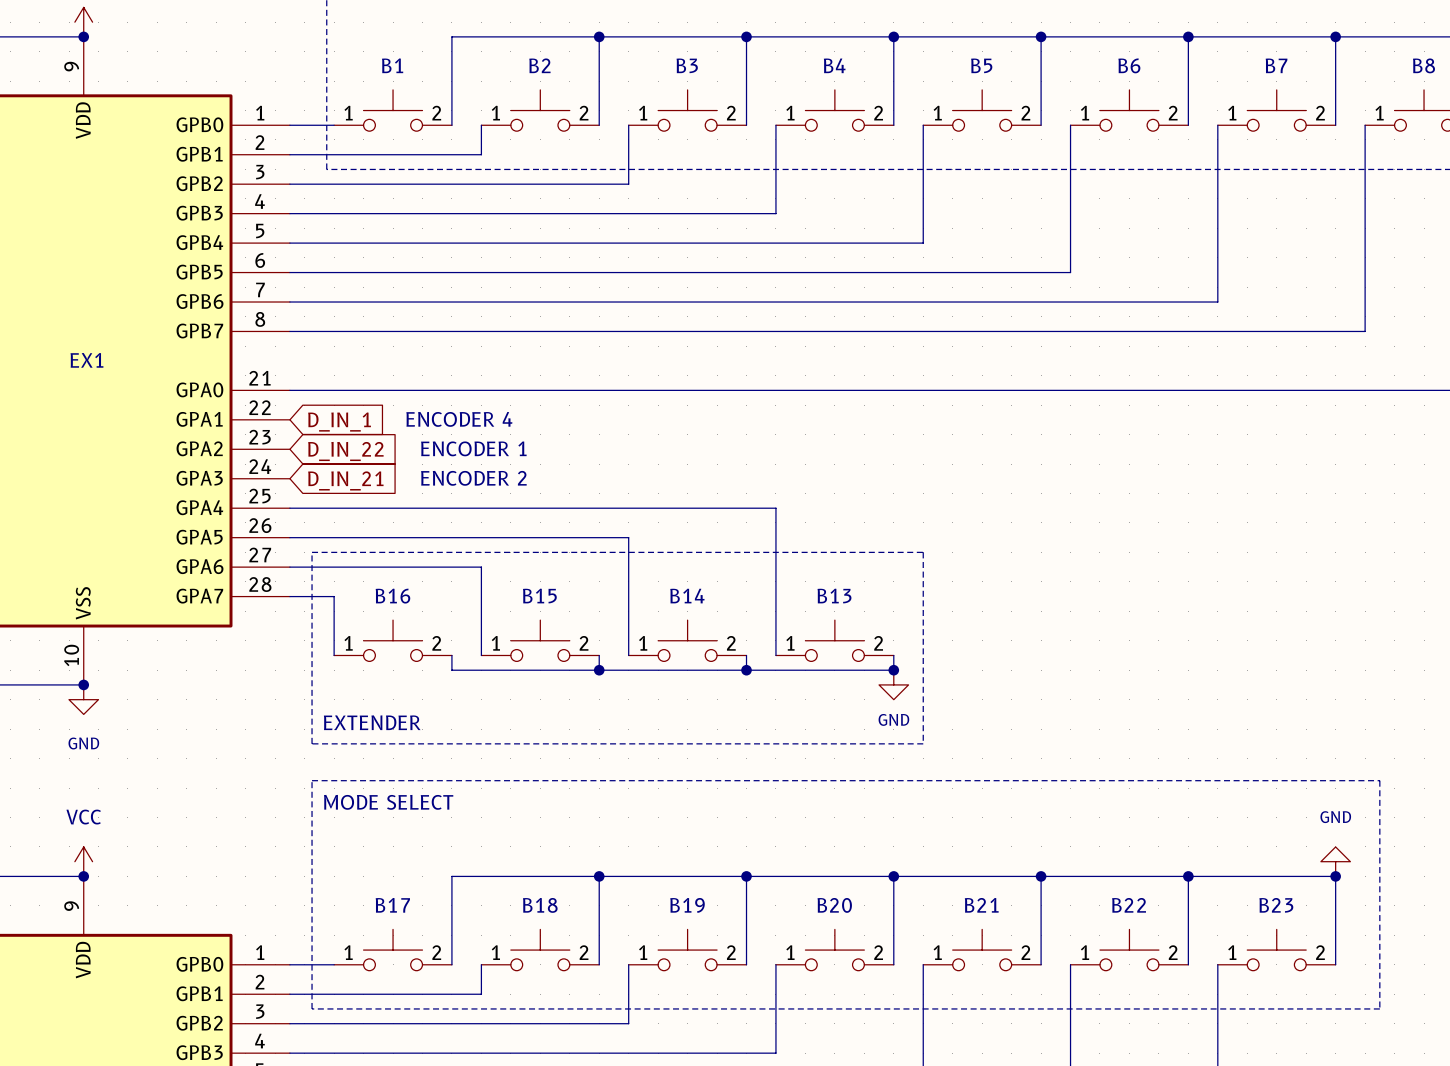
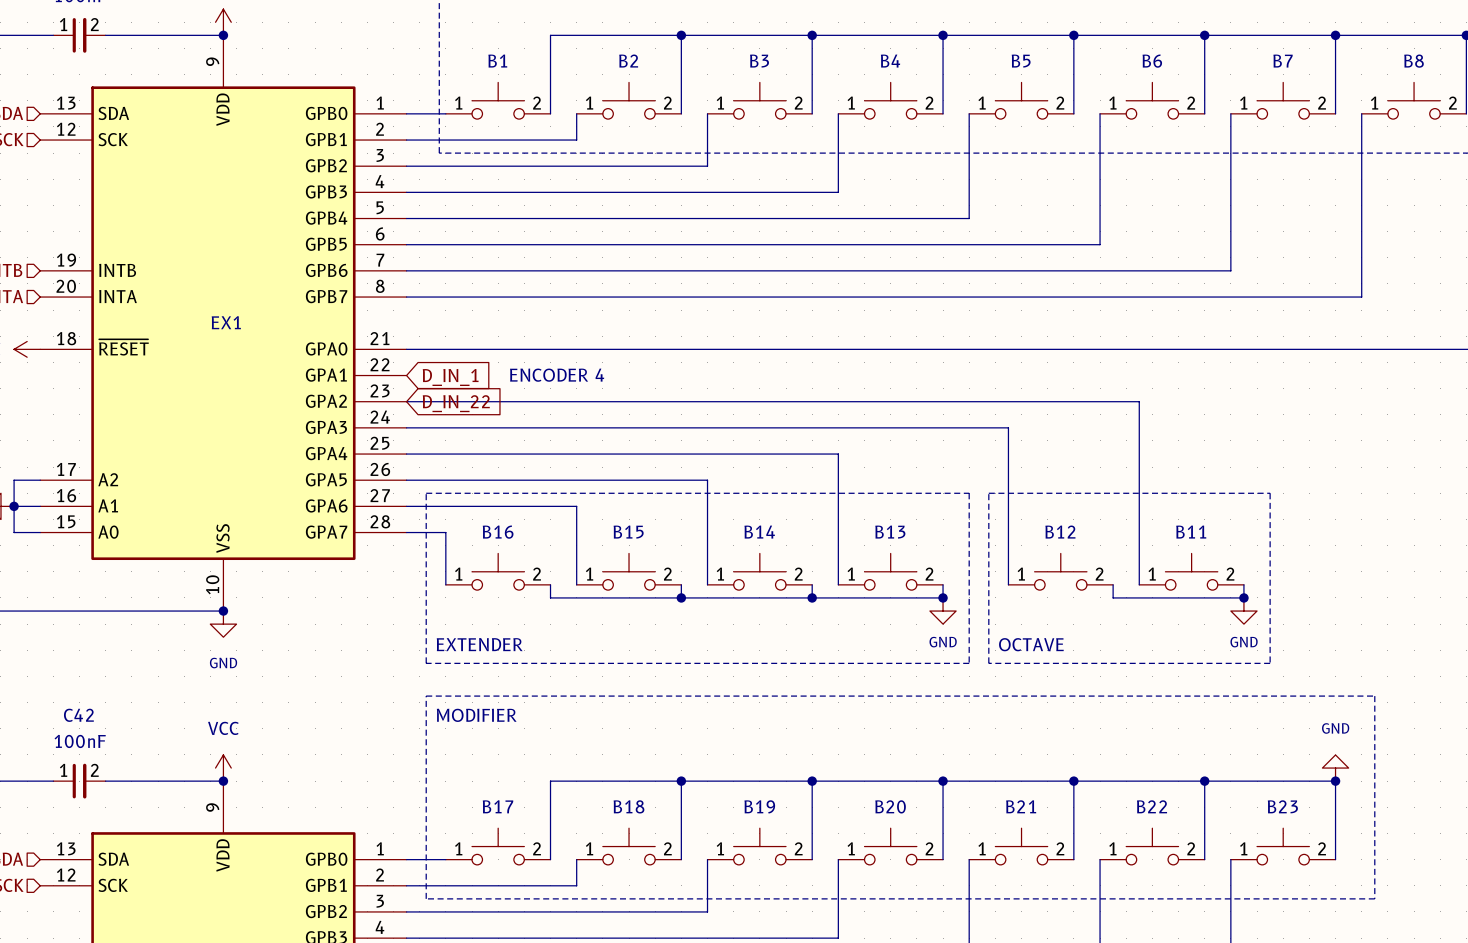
text: ENCODER 1 (473, 448) -> none
wire: none -> (406, 401) (1139, 401) (1139, 584)
wire: none -> (406, 427) (1008, 427) (1008, 584)
text: ENCODER 2 (473, 478) -> none
global label: D_IN_21 (345, 480) -> none
line: none -> (988, 493) (1270, 493) (1270, 663) (988, 663) (988, 493)
B12: none -> (1060, 571)
B11: none -> (1191, 571)
wire: none -> (1113, 584) (1113, 597) (1243, 597) (1243, 584)
junction: none -> (1243, 597)
power symbol: none -> GND (1243, 611)
text: none -> OCTAVE (1031, 644)
text: MODE SELECT (388, 802) -> MODIFIER (476, 715)

